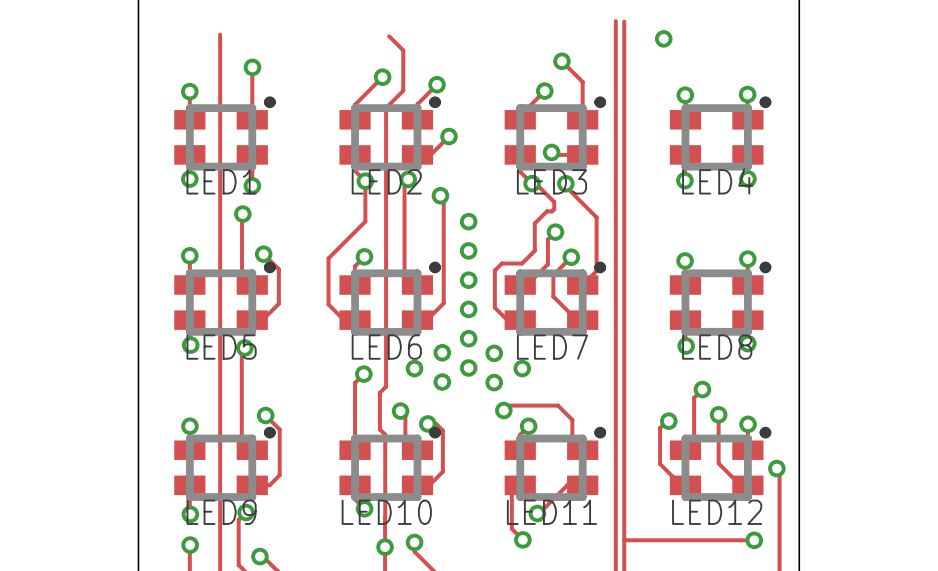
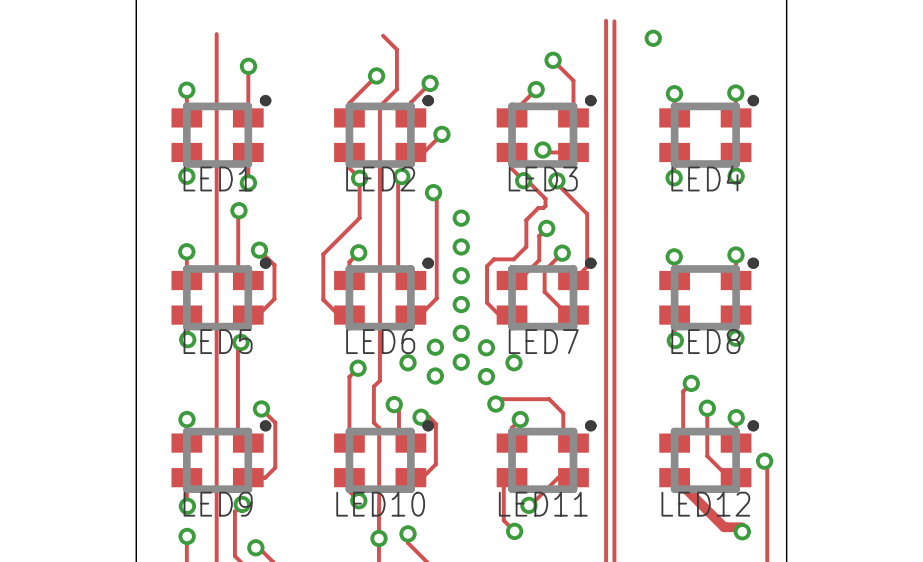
track: (668, 421) (660, 428) (660, 464) (681, 485) (685, 485) -> (741, 527) (724, 527) (674, 477)
via: (668, 421) -> none
track: (624, 540) (754, 540) -> none

